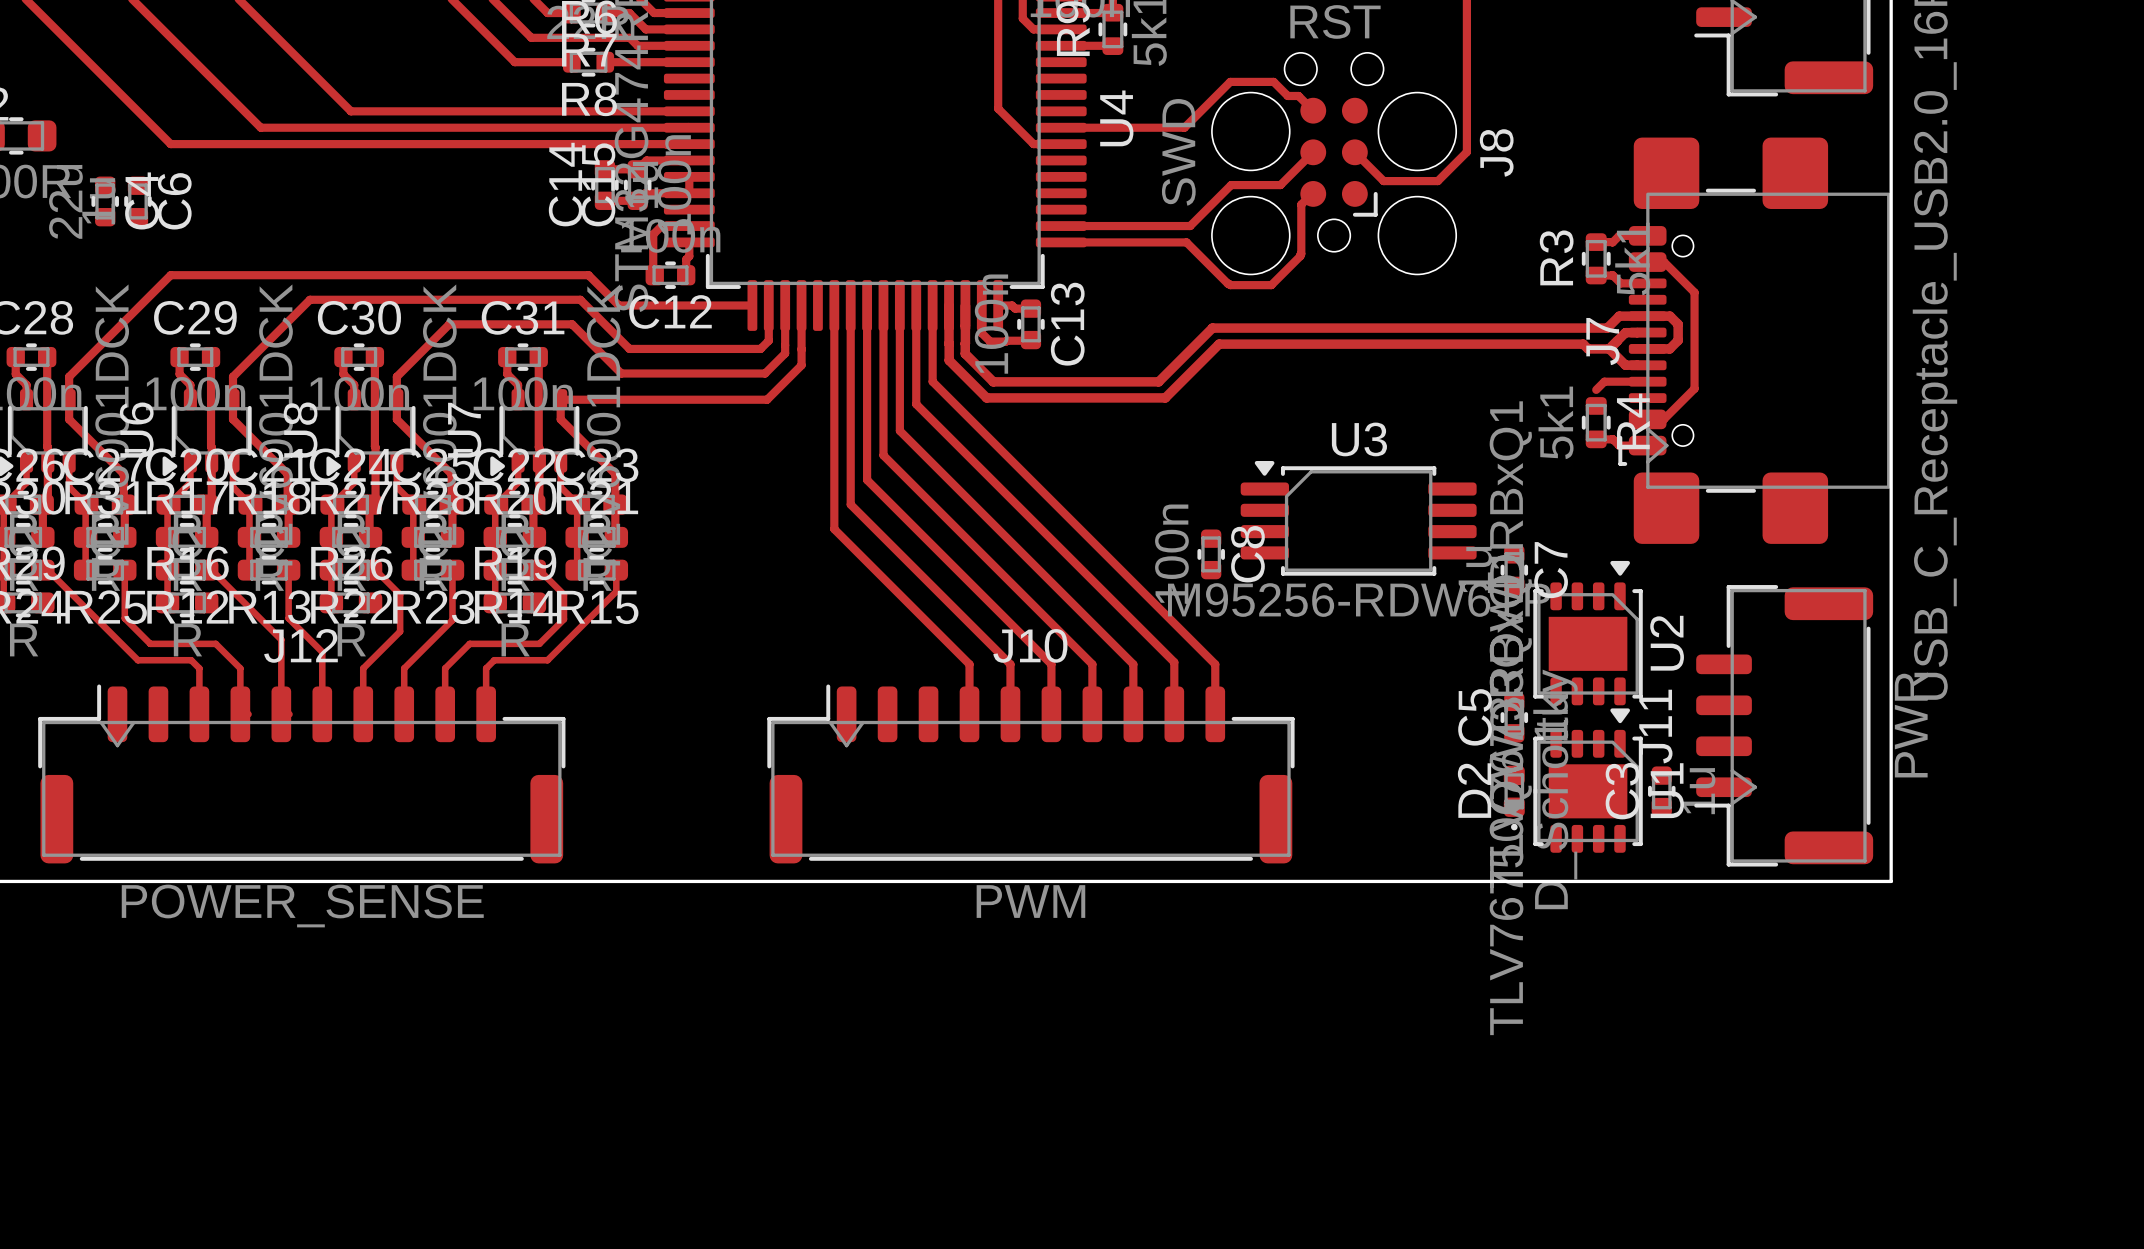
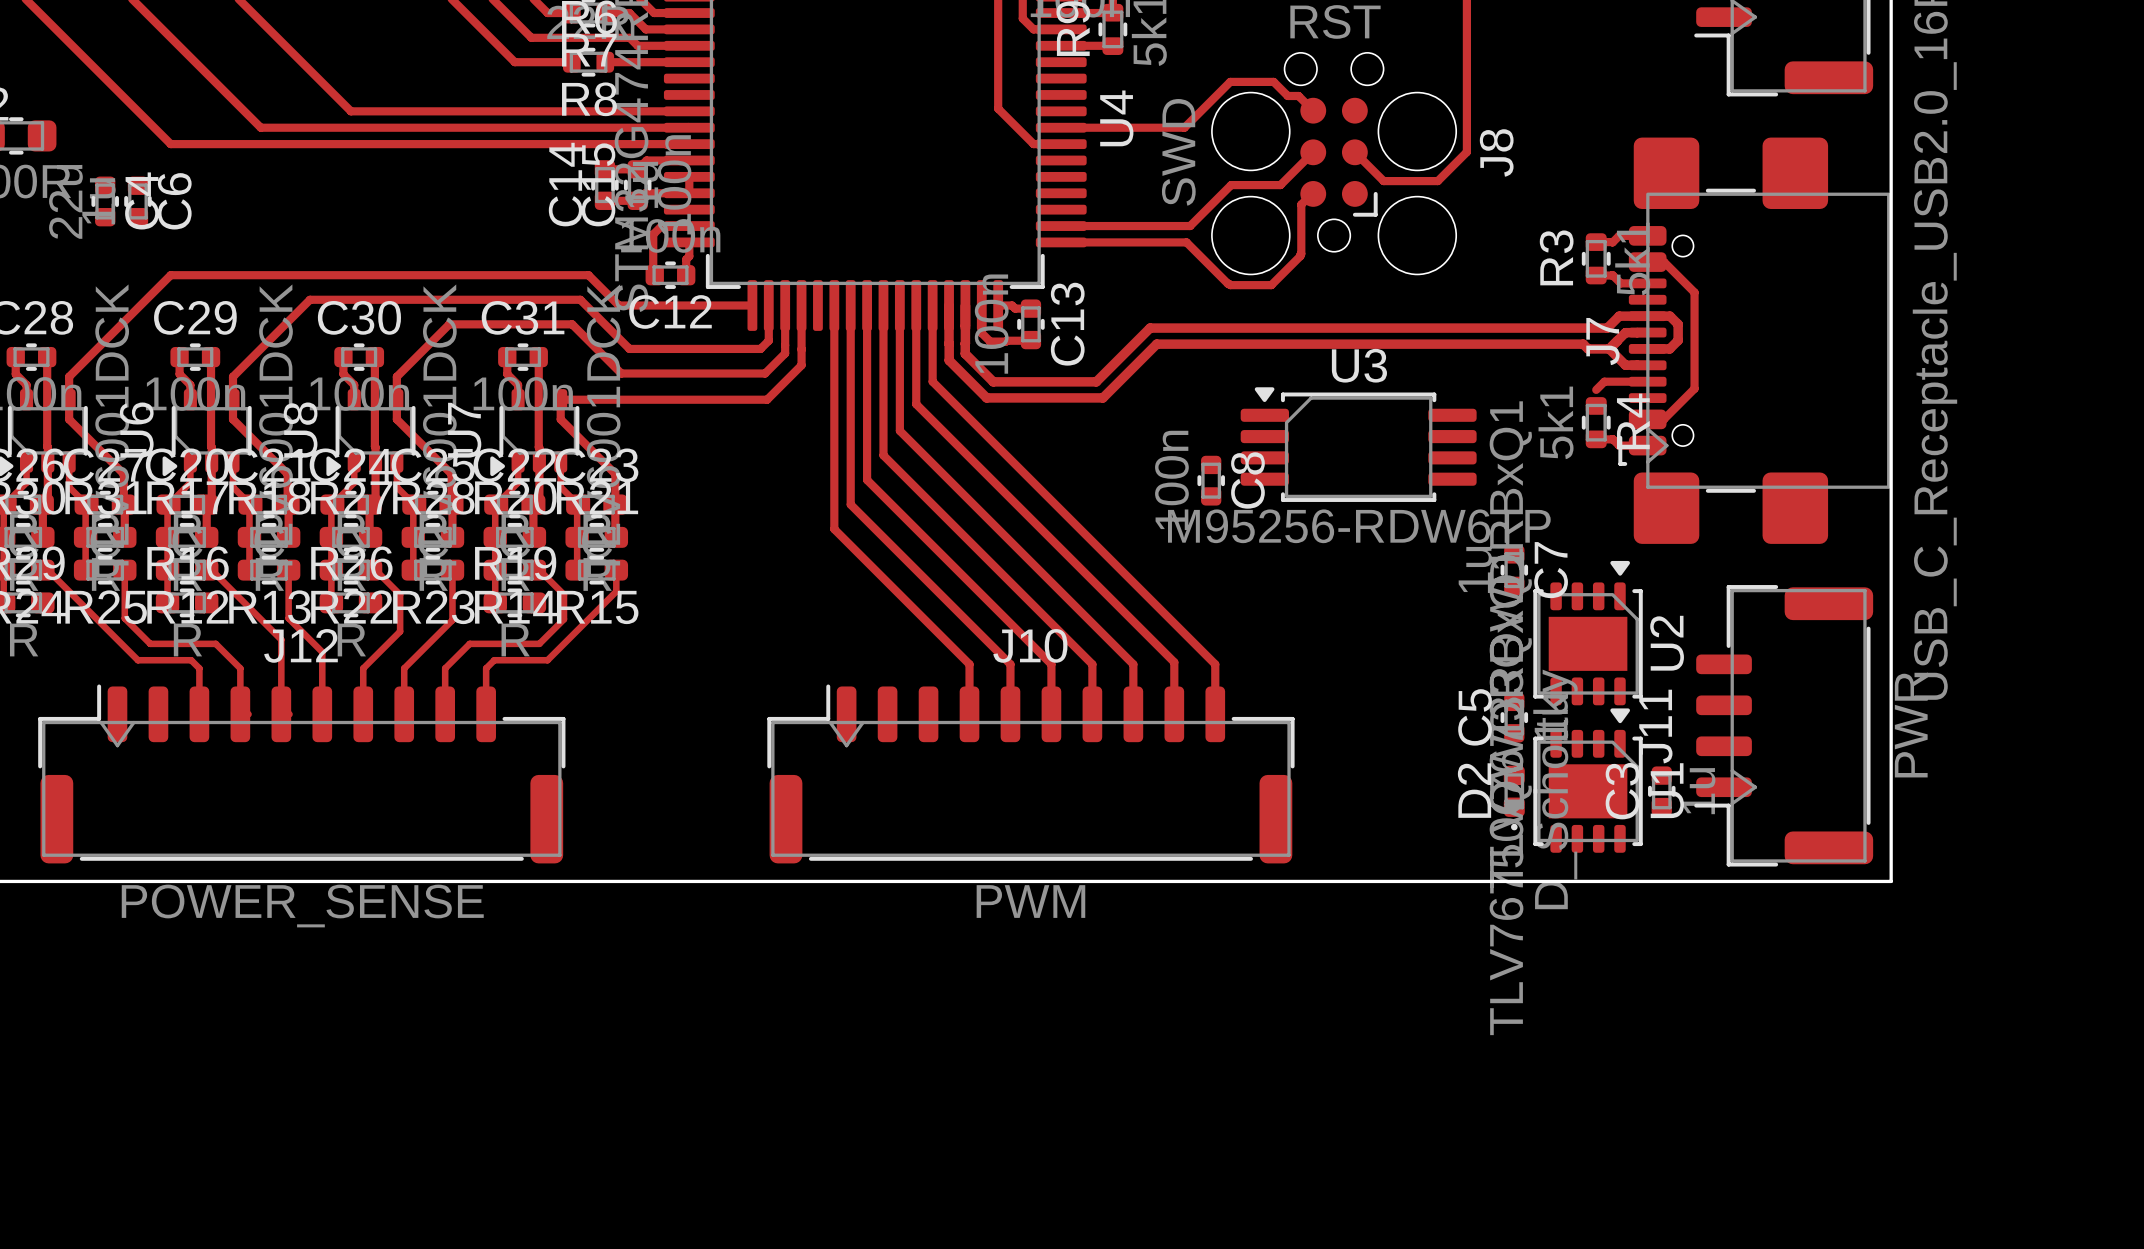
top track: (1212, 328) (1158, 381) (1096, 381) -> (1212, 328) (1150, 328) (1096, 381)
top track: (1219, 344) (1165, 397) (1102, 397) -> (1219, 344) (1156, 344) (1102, 397)
U3 position: (1358, 518) -> (1358, 444)
C8 position: (1211, 554) -> (1211, 480)

